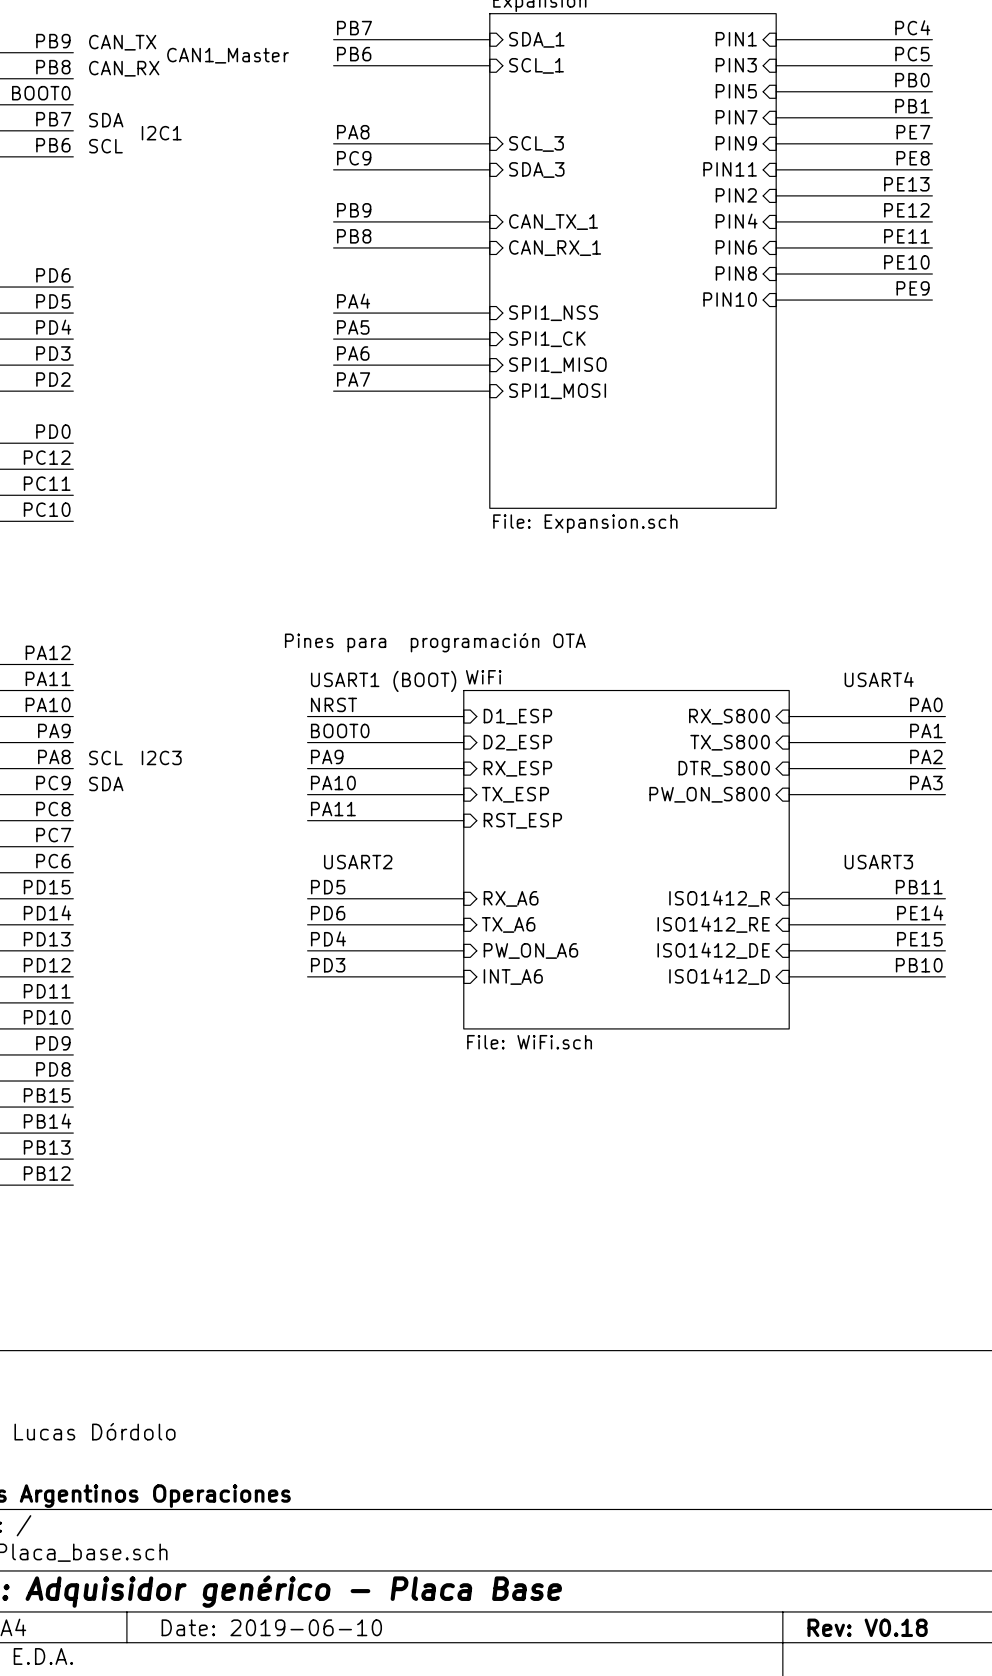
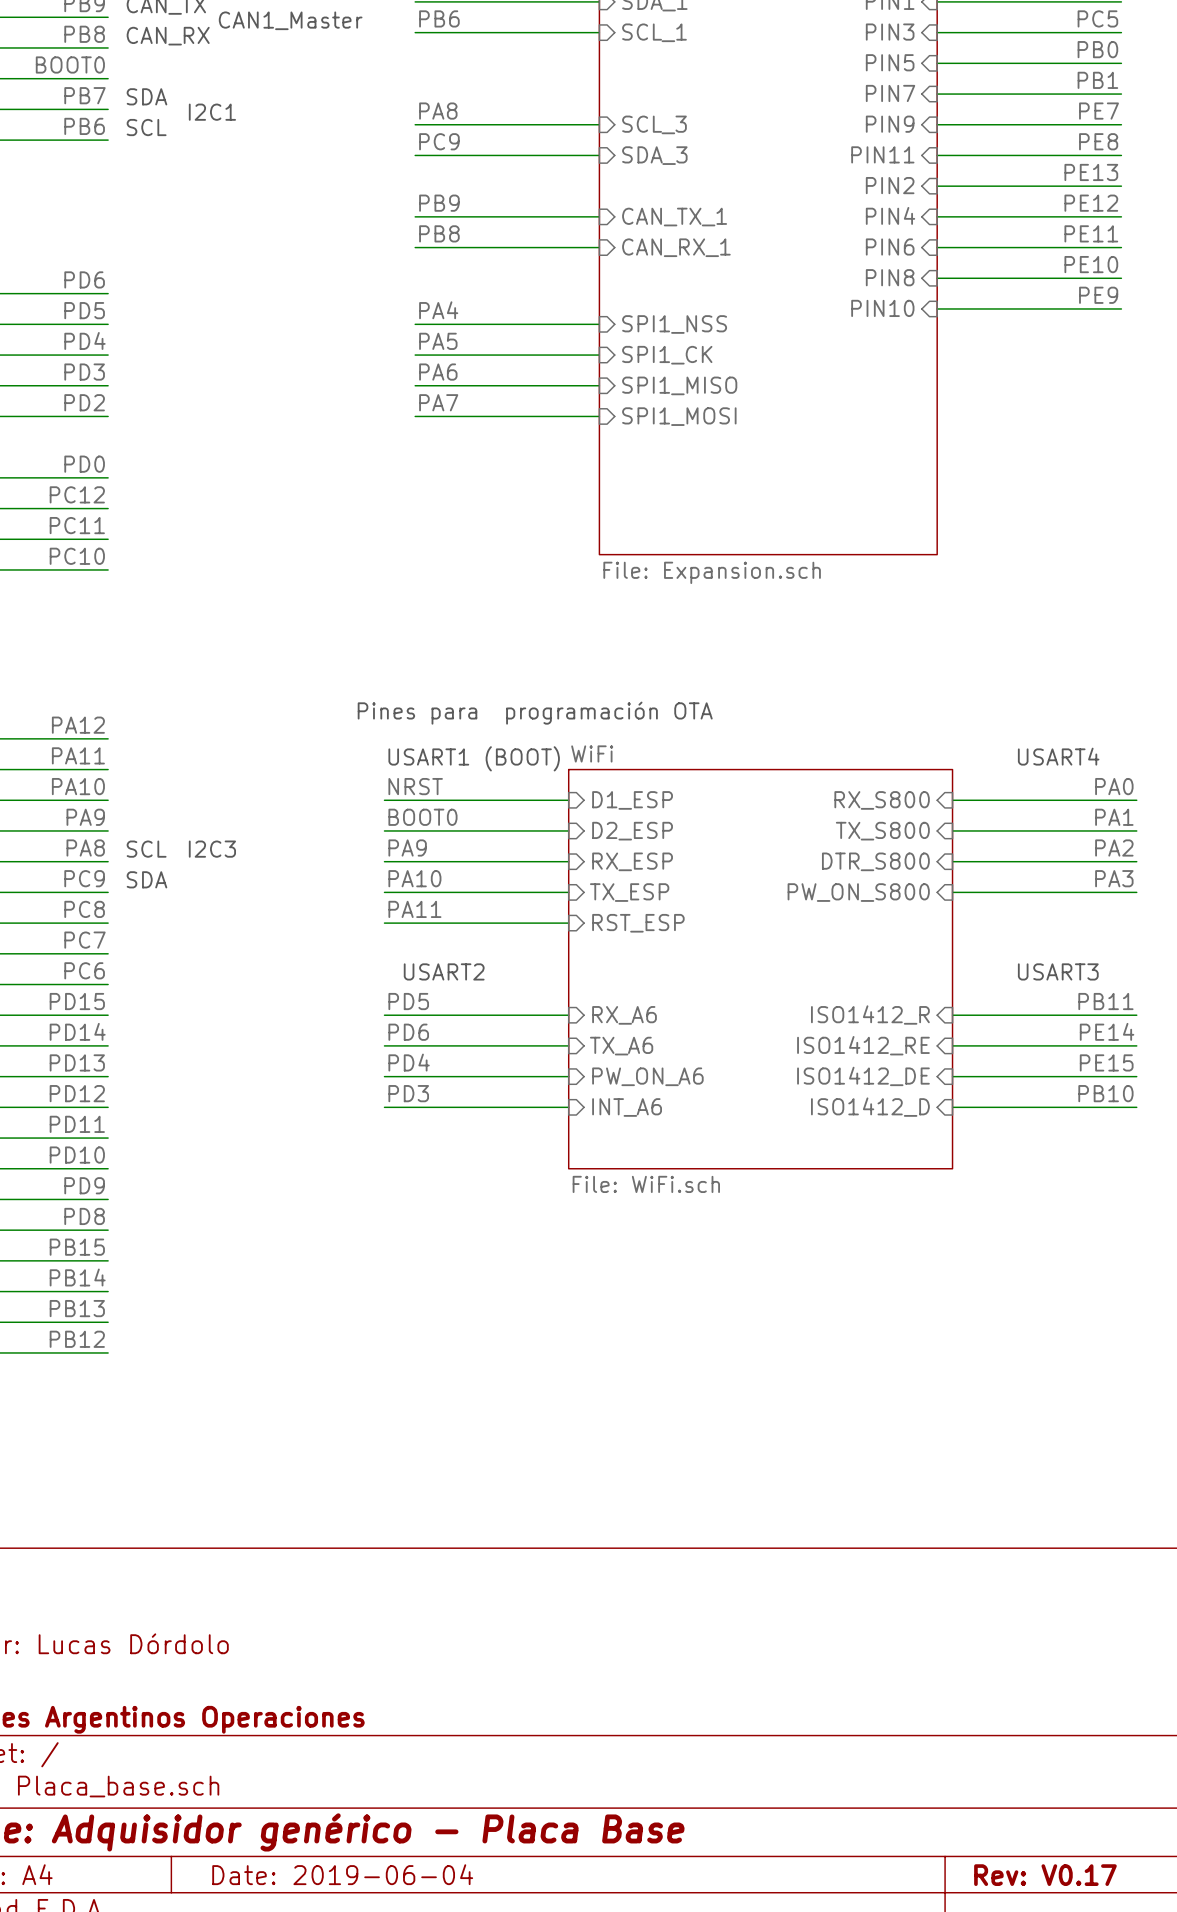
title block: Date: 2019-06-10 (271, 1627) -> Date: 2019-06-04 (342, 1874)
title block: Rev: V0.18 (867, 1627) -> Rev: V0.17 (1045, 1875)

